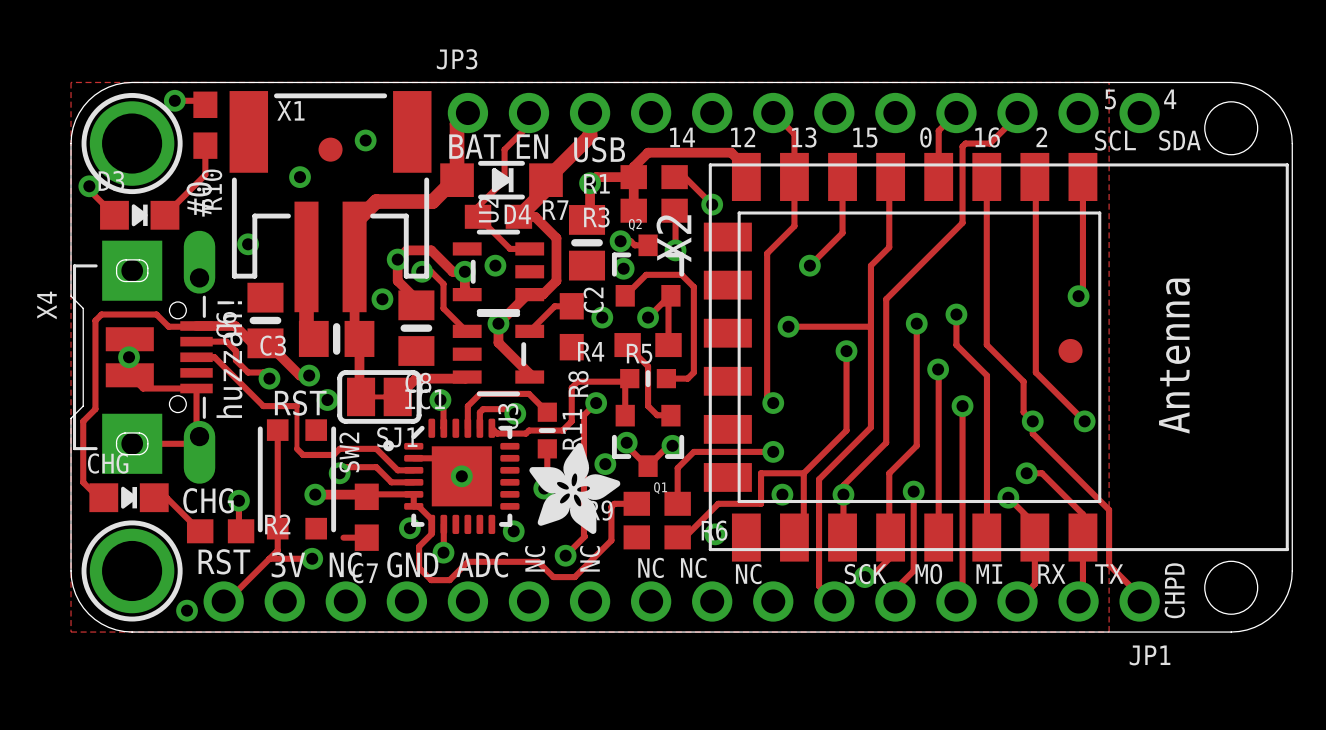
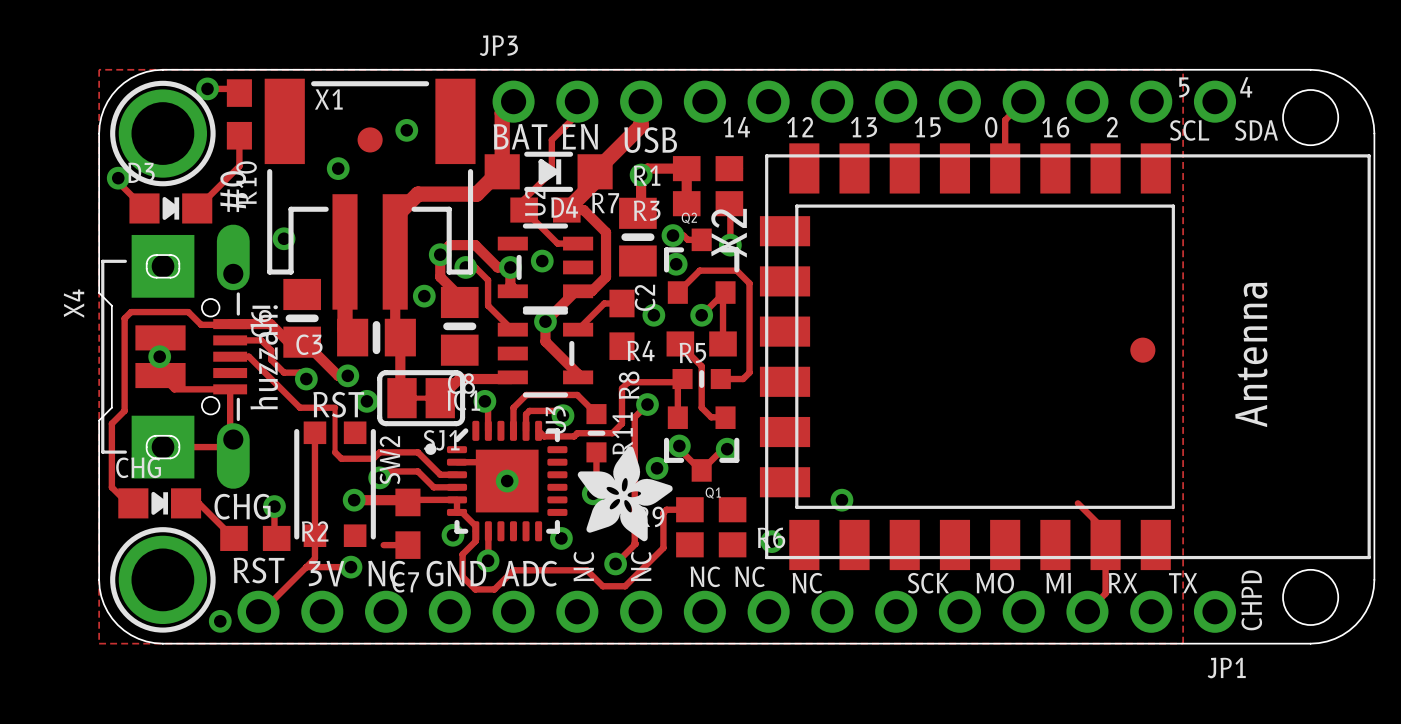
track: (773, 113) (794, 134) (794, 226) (767, 253) (767, 396) (773, 403) -> none
track: (1017, 116) (990, 143) (965, 143) (962, 146) (962, 222) (886, 299) (886, 442) (843, 485) (842, 537) -> none
track: (746, 176) (746, 167) (731, 152) (648, 152) (633, 167) (633, 177) -> none
track: (842, 176) (842, 233) (809, 265) -> none
track: (890, 176) (889, 247) (870, 265) (870, 427) (819, 479) (819, 586) (834, 601) -> none
track: (986, 176) (986, 344) (1023, 381) (1023, 412) (1032, 421) (1032, 433) (1109, 509) (1109, 564) (1139, 595) (1139, 601) -> none
track: (1034, 176) (1035, 372) (1084, 421) -> none
track: (1082, 176) (1082, 291) (1078, 296) -> none
track: (684, 177) (712, 204) -> none
via: (712, 204) -> none
via: (809, 265) -> none
via: (1078, 296) -> none
track: (956, 314) (956, 345) (986, 375) (986, 537) -> none
via: (956, 314) -> none
track: (916, 323) (916, 445) (889, 473) (890, 557) (864, 583) (864, 577) -> none
via: (916, 323) -> none
track: (788, 326) (870, 326) -> none
via: (788, 326) -> none
track: (846, 351) (846, 430) (803, 473) -> none
via: (846, 351) -> none
track: (938, 369) (938, 537) -> none
via: (938, 369) -> none
via: (773, 403) -> none
track: (962, 406) (962, 595) (956, 601) -> none
via: (962, 406) -> none
via: (1032, 421) -> none
via: (1084, 421) -> none
track: (773, 451) (693, 451) (677, 468) (677, 503) -> none
via: (773, 451) -> none
track: (803, 473) (803, 528) (794, 537) -> none
track: (803, 473) (761, 473) (761, 503) (718, 503) (684, 537) -> none
track: (1026, 473) (1041, 473) (1082, 514) (1082, 597) (1078, 601) -> none
via: (1026, 473) -> none
track: (913, 491) (913, 570) (895, 589) (895, 601) -> none
via: (913, 491) -> none
via: (843, 494) -> none
via: (1008, 497) -> none
via: (864, 577) -> none

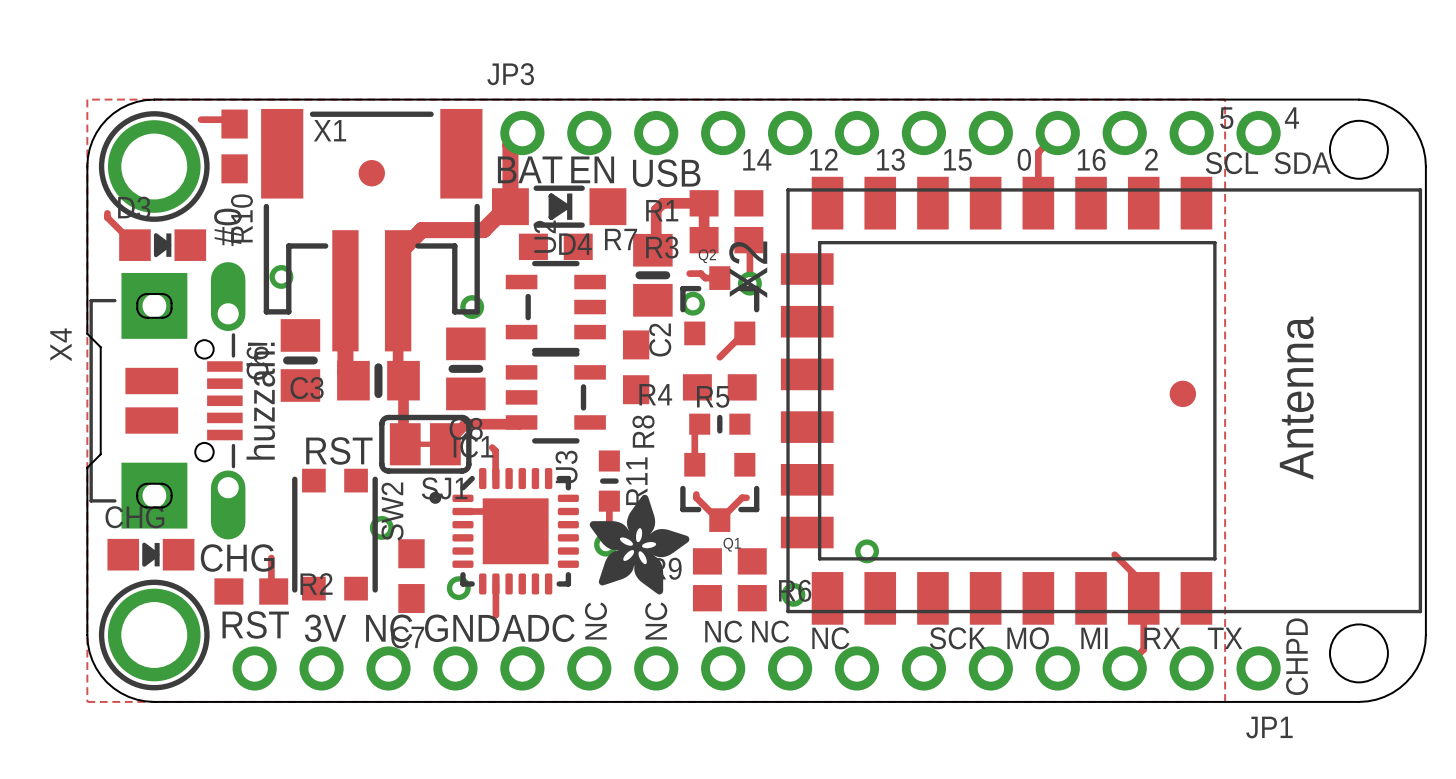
via: (207, 88) -> none
track: (577, 101) (577, 114) (551, 139) (551, 171) (524, 199) (524, 210) (557, 243) (578, 243) -> none
track: (641, 101) (641, 125) (595, 171) (595, 181) (566, 210) (583, 210) (606, 232) (606, 277) (591, 291) (575, 291) (545, 321) (545, 341) (578, 374) (578, 377) -> none
via: (406, 130) -> none
track: (239, 135) (239, 166) (197, 208) -> none
via: (338, 168) -> none
via: (641, 174) -> none
via: (118, 178) -> none
via: (672, 235) -> none
via: (440, 254) -> none
via: (542, 261) -> none
track: (465, 267) (475, 267) (488, 280) (488, 305) (512, 329) -> none
via: (510, 267) -> none
track: (512, 291) (510, 285) (510, 267) (497, 267) (475, 245) (449, 245) (440, 254) (440, 277) (459, 296) (459, 302) -> none
track: (677, 292) (699, 270) (736, 270) (749, 283) (749, 372) (743, 379) (720, 379) -> none
track: (725, 292) (723, 292) (723, 343) -> none
via: (424, 296) -> none
track: (621, 303) (604, 303) (578, 329) -> none
via: (653, 315) -> none
via: (701, 315) -> none
via: (545, 321) -> none
track: (230, 340) (261, 340) (271, 350) (271, 359) (284, 372) (299, 372) (306, 379) -> none
track: (680, 343) (701, 366) (701, 407) (711, 417) (725, 417) -> none
via: (159, 356) -> none
track: (230, 356) (248, 356) (299, 407) (335, 407) (335, 452) (341, 458) (373, 458) (379, 452) (417, 452) (440, 474) (457, 474) -> none
track: (160, 375) (174, 389) (230, 389) (230, 436) (233, 439) (225, 447) (163, 447) -> none
track: (347, 375) (338, 375) (304, 342) (288, 342) (270, 324) (201, 324) (188, 312) (131, 312) (124, 318) (124, 410) (111, 423) (111, 487) (127, 503) (133, 503) -> none
via: (347, 375) -> none
via: (306, 379) -> none
track: (679, 382) (628, 382) (621, 388) (621, 423) (612, 433) (577, 433) (574, 436) (544, 436) (538, 430) -> none
via: (366, 401) -> none
via: (484, 401) -> none
track: (647, 404) (634, 417) (635, 543) (615, 563) -> none
via: (647, 404) -> none
track: (596, 414) (577, 394) (526, 394) (513, 407) (513, 430) -> none
track: (563, 415) (558, 410) (529, 410) (526, 414) (526, 430) -> none
via: (563, 415) -> none
track: (314, 432) (314, 558) (261, 611) (258, 611) -> none
via: (679, 445) -> none
via: (727, 449) -> none
via: (657, 468) -> none
track: (379, 477) (386, 471) (417, 471) (433, 487) (457, 487) -> none
via: (507, 481) -> none
track: (354, 500) (405, 500) (411, 502) (413, 499) (457, 499) (457, 512) (462, 512) (475, 526) (475, 541) (462, 554) (462, 576) (475, 589) (494, 589) (513, 570) (586, 570) (602, 586) (625, 586) (663, 548) (663, 512) (666, 509) (689, 509) -> none
via: (354, 500) -> none
track: (186, 503) (198, 503) (234, 538) -> none
via: (274, 506) -> none
via: (561, 538) -> none
track: (383, 545) (407, 545) -> none
via: (488, 560) -> none
via: (615, 563) -> none
track: (306, 567) (350, 567) -> none
via: (350, 567) -> none
via: (220, 621) -> none

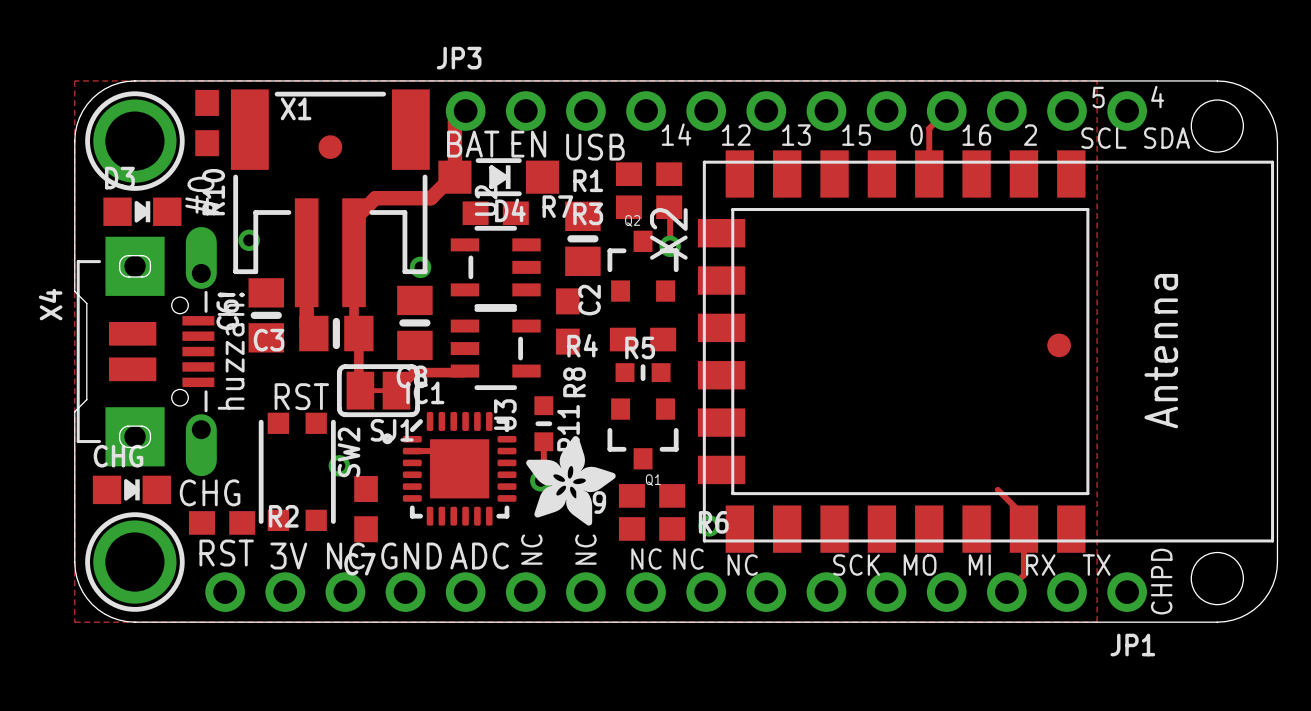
track: (201, 119) (230, 119) (234, 124) -> none
track: (107, 213) (107, 217) (134, 245) -> none
track: (704, 240) (704, 203) (662, 203) (656, 210) (656, 246) (652, 250) -> none
track: (689, 273) (700, 273) (705, 278) (719, 278) -> none
via: (693, 303) -> none
track: (743, 333) (719, 357) -> none
track: (699, 424) (694, 429) (694, 464) -> none
track: (492, 447) (495, 450) (495, 478) -> none
track: (696, 494) (696, 497) (718, 520) (742, 497) (746, 497) -> none
via: (867, 551) -> none
track: (271, 558) (271, 589) (273, 591) -> none
track: (495, 583) (495, 615) -> none
via: (458, 588) -> none

